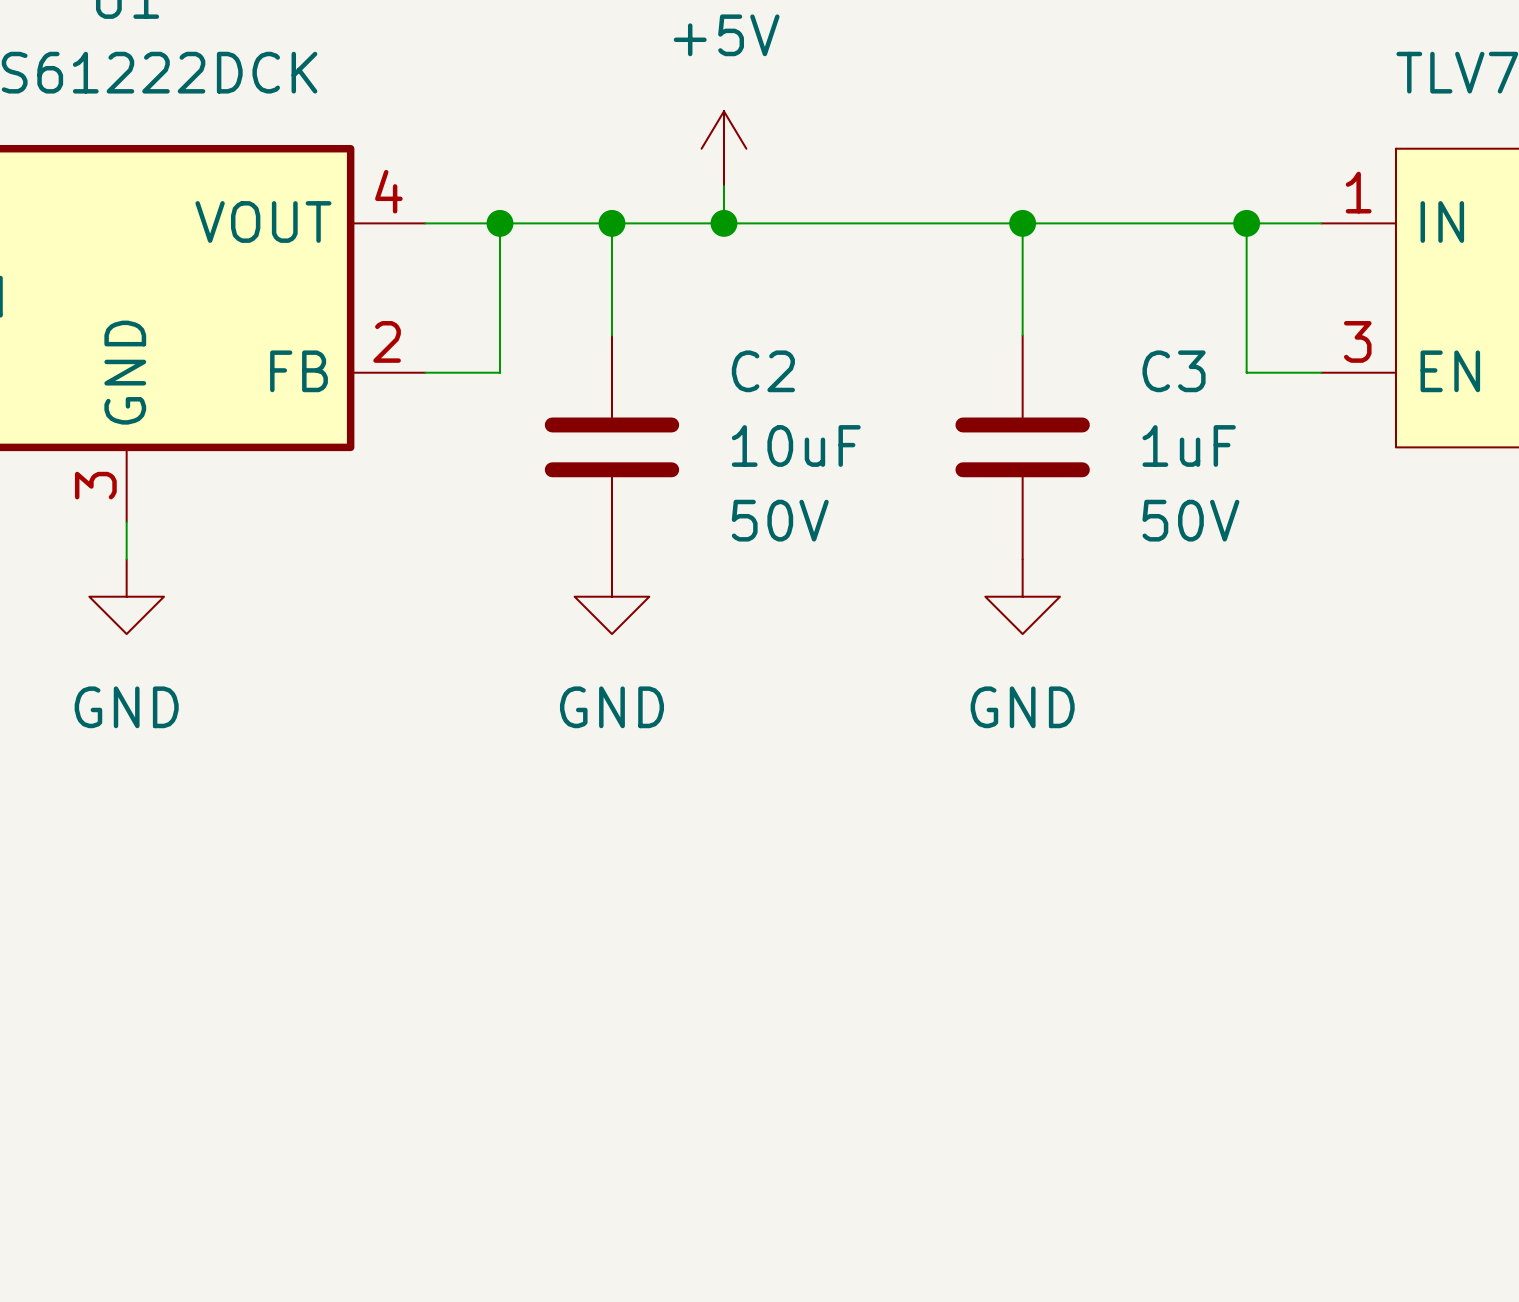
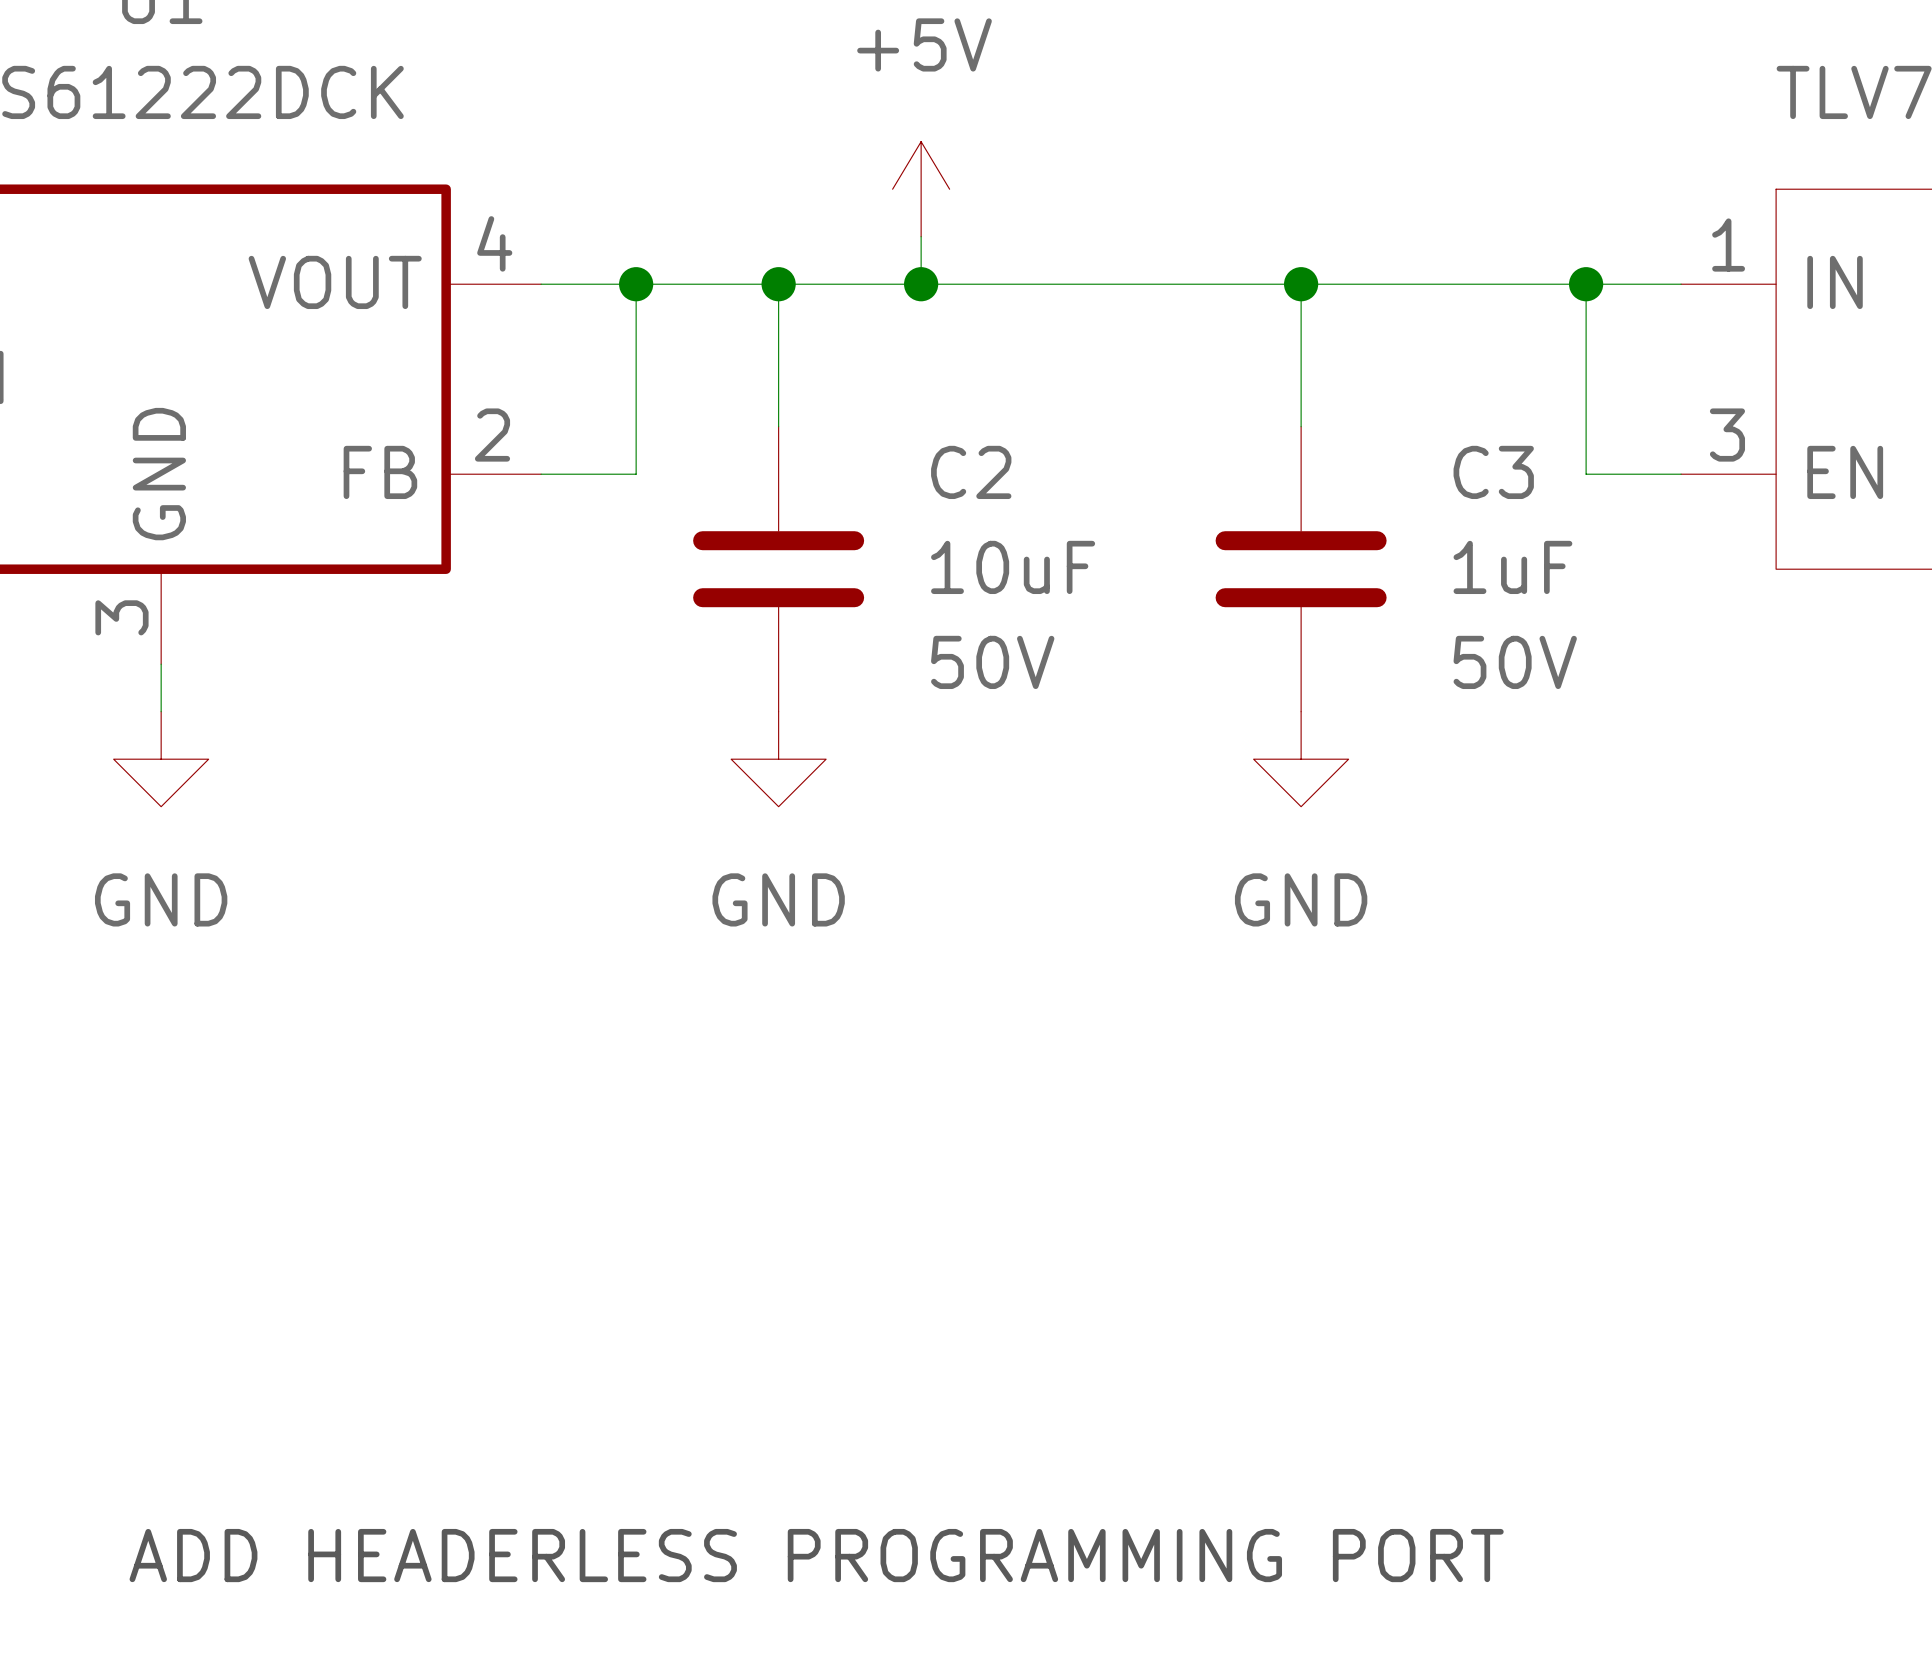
text: none -> ADD HEADERLESS PROGRAMMING PORT (816, 1555)

